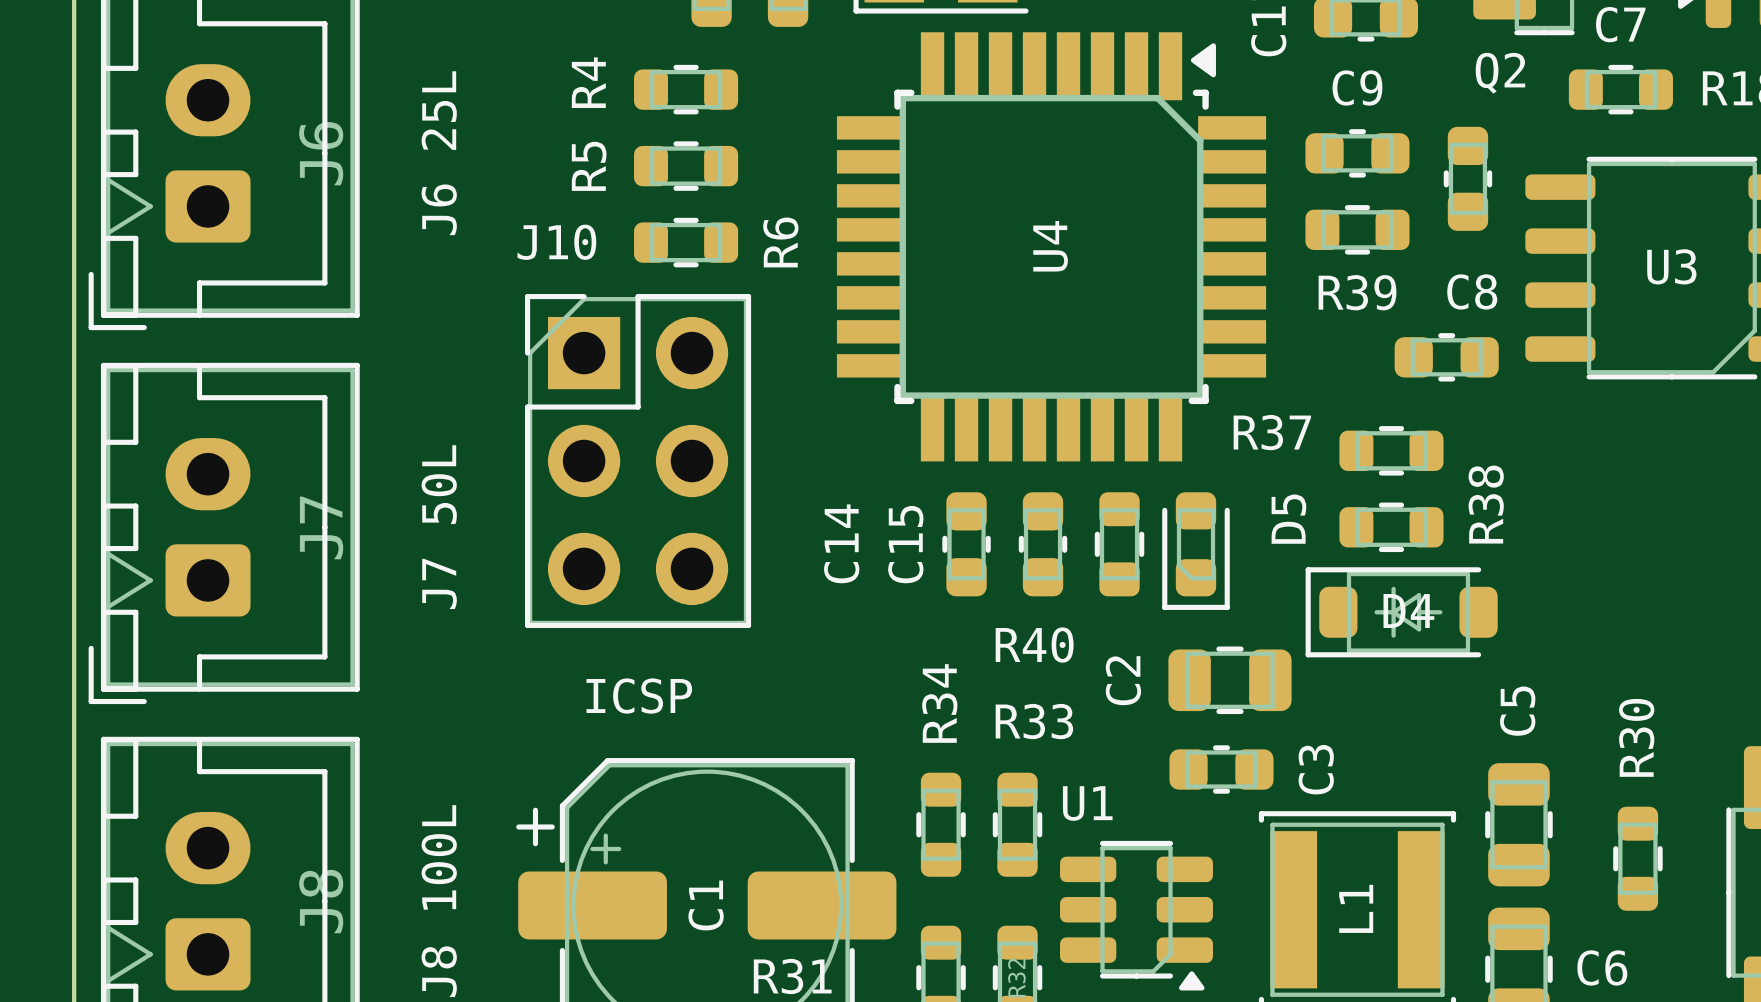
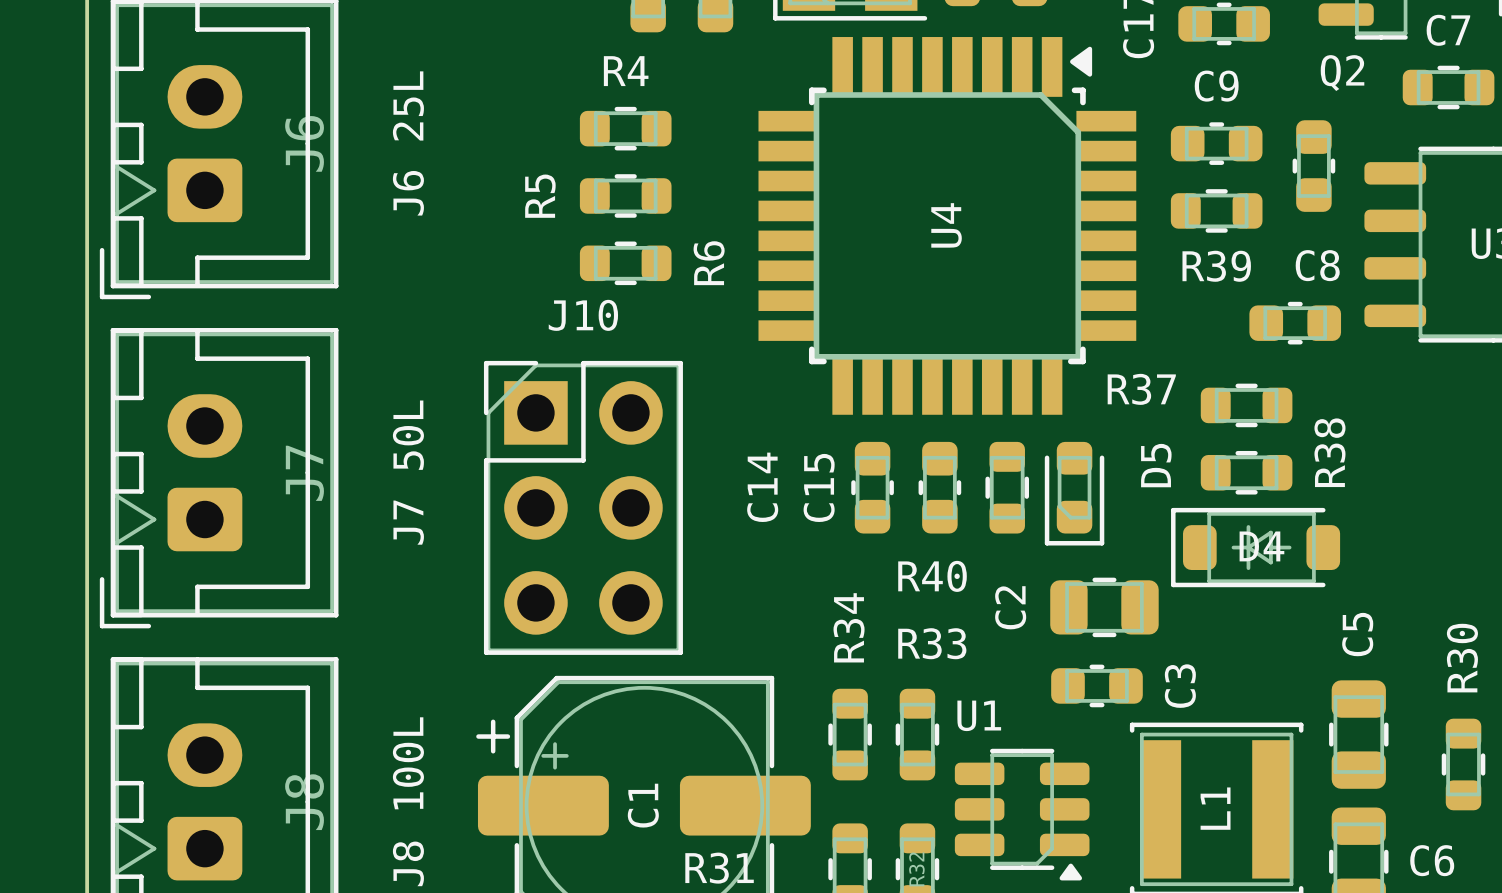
R4 name rotation: 0° (588, 82) -> 90° clockwise (626, 71)
R4 name position: R4 (588, 82) -> R4 (626, 71)
R4 position: (686, 89) -> (625, 128)
R5 position: (686, 166) -> (625, 195)
J10 name position: J10 (556, 242) -> J10 (583, 315)
R6 position: (686, 242) -> (625, 263)
J10 position: (638, 461) -> (583, 507)
text: ICSP (639, 696) -> none

